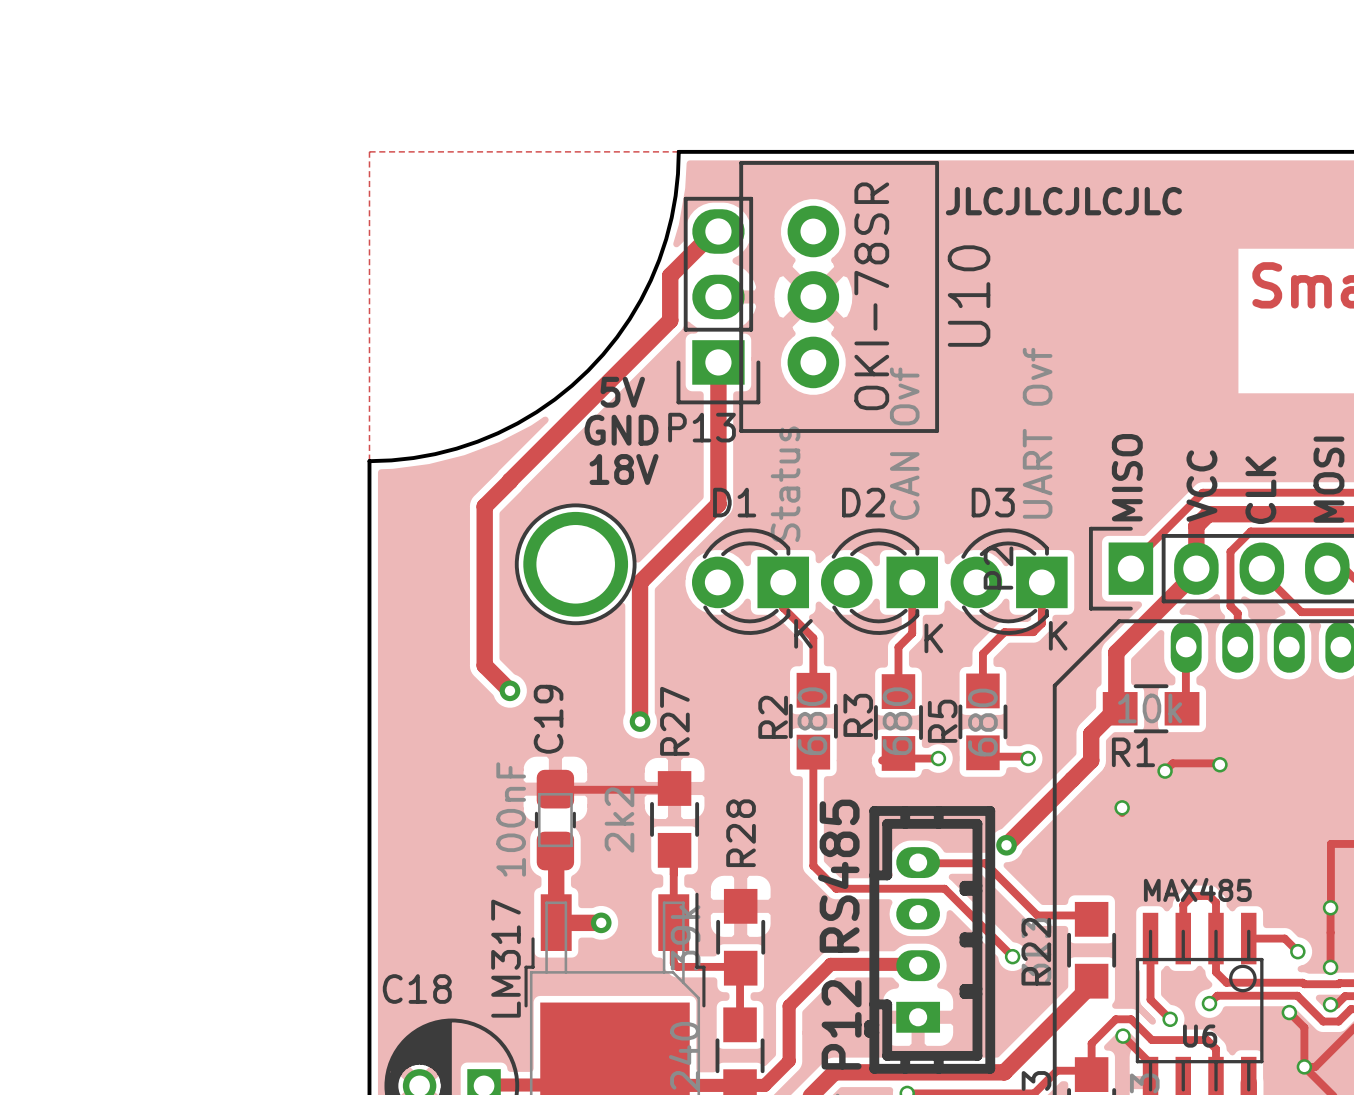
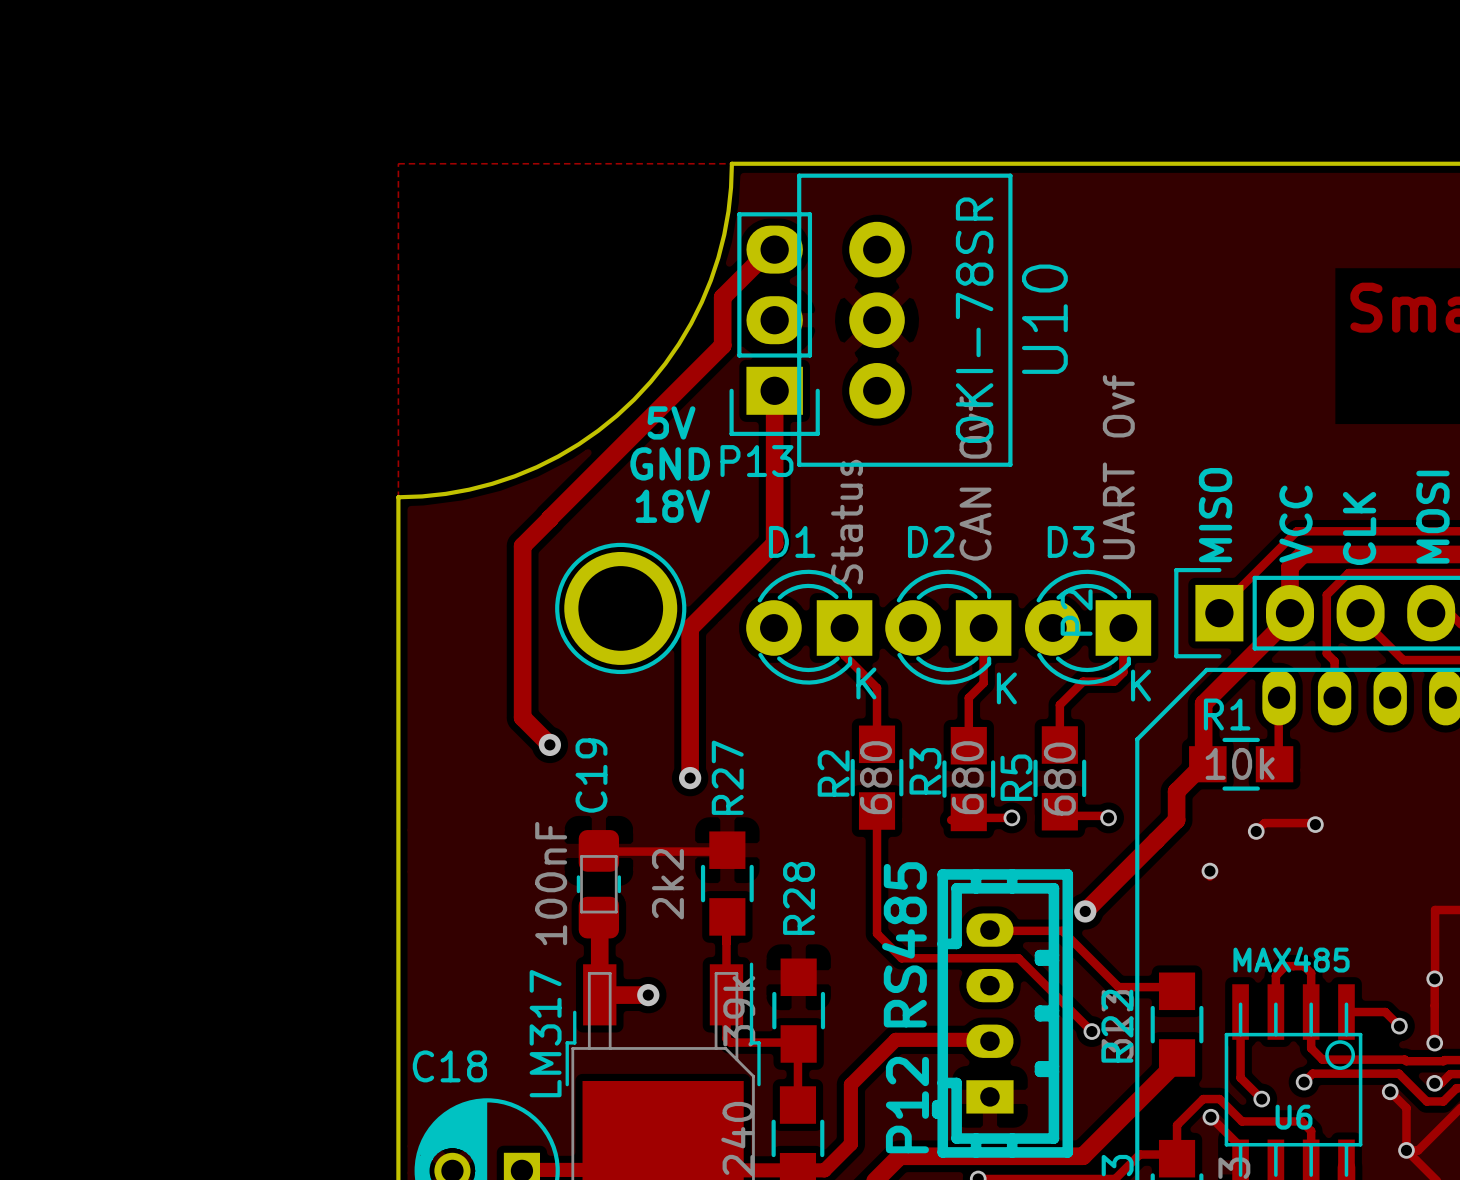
text: JLCJLCJLCJLC (1063, 201) -> none
U10 value position: OKI-78SR (871, 296) -> OKI-78SR (974, 320)
R1 name position: R1 (1133, 752) -> R1 (1227, 714)

